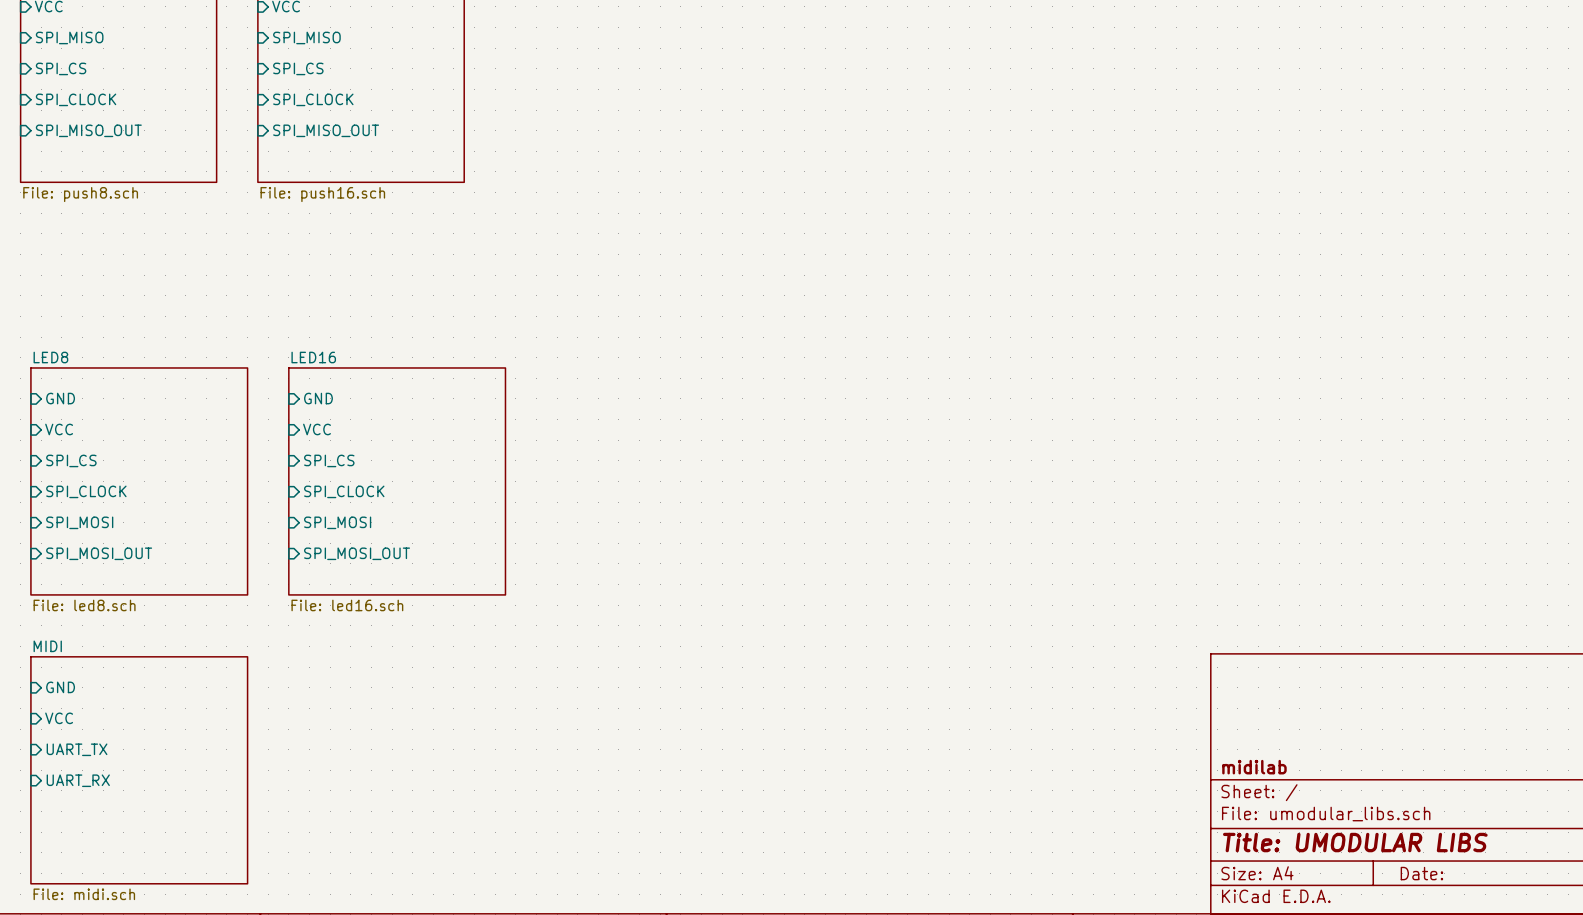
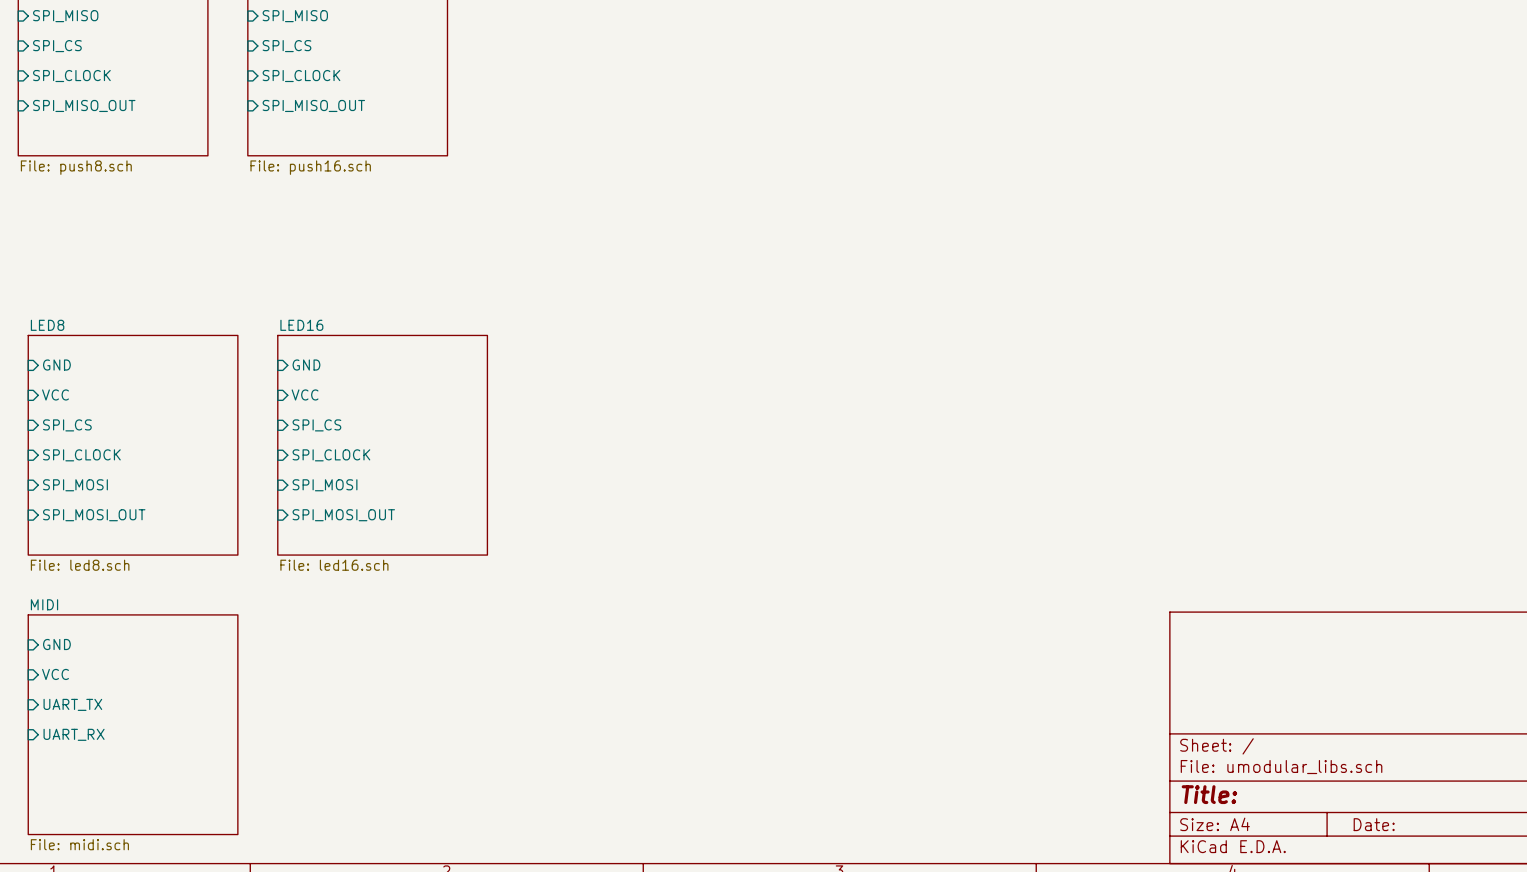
title block: midilab (1254, 767) -> none
title block: Title: UMODULAR LIBS (1355, 842) -> Title: (1209, 794)

